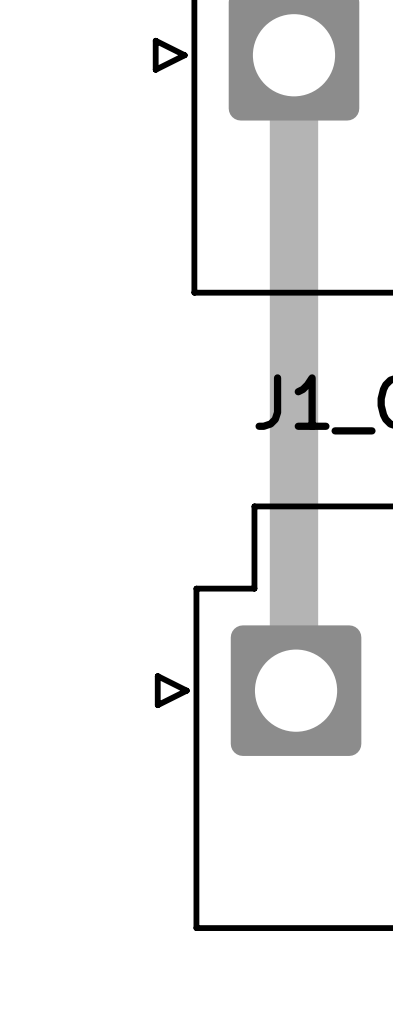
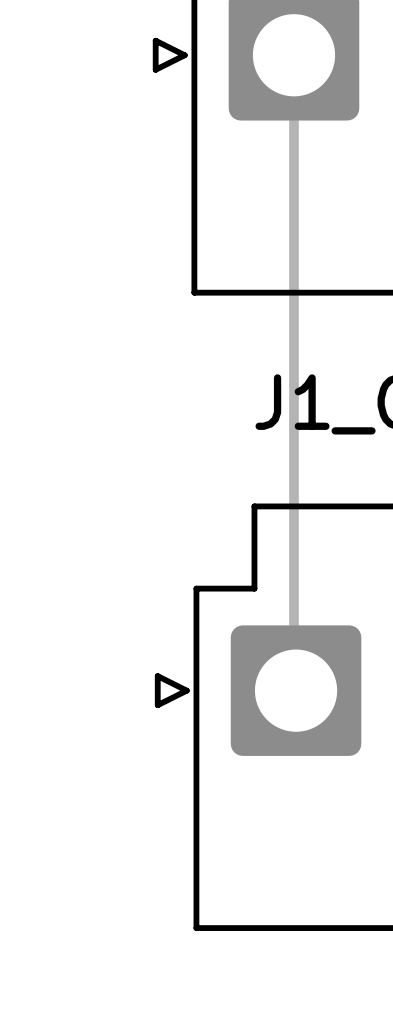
track width: thick (293, 55) (293, 688) -> thin (293, 55) (293, 688)

